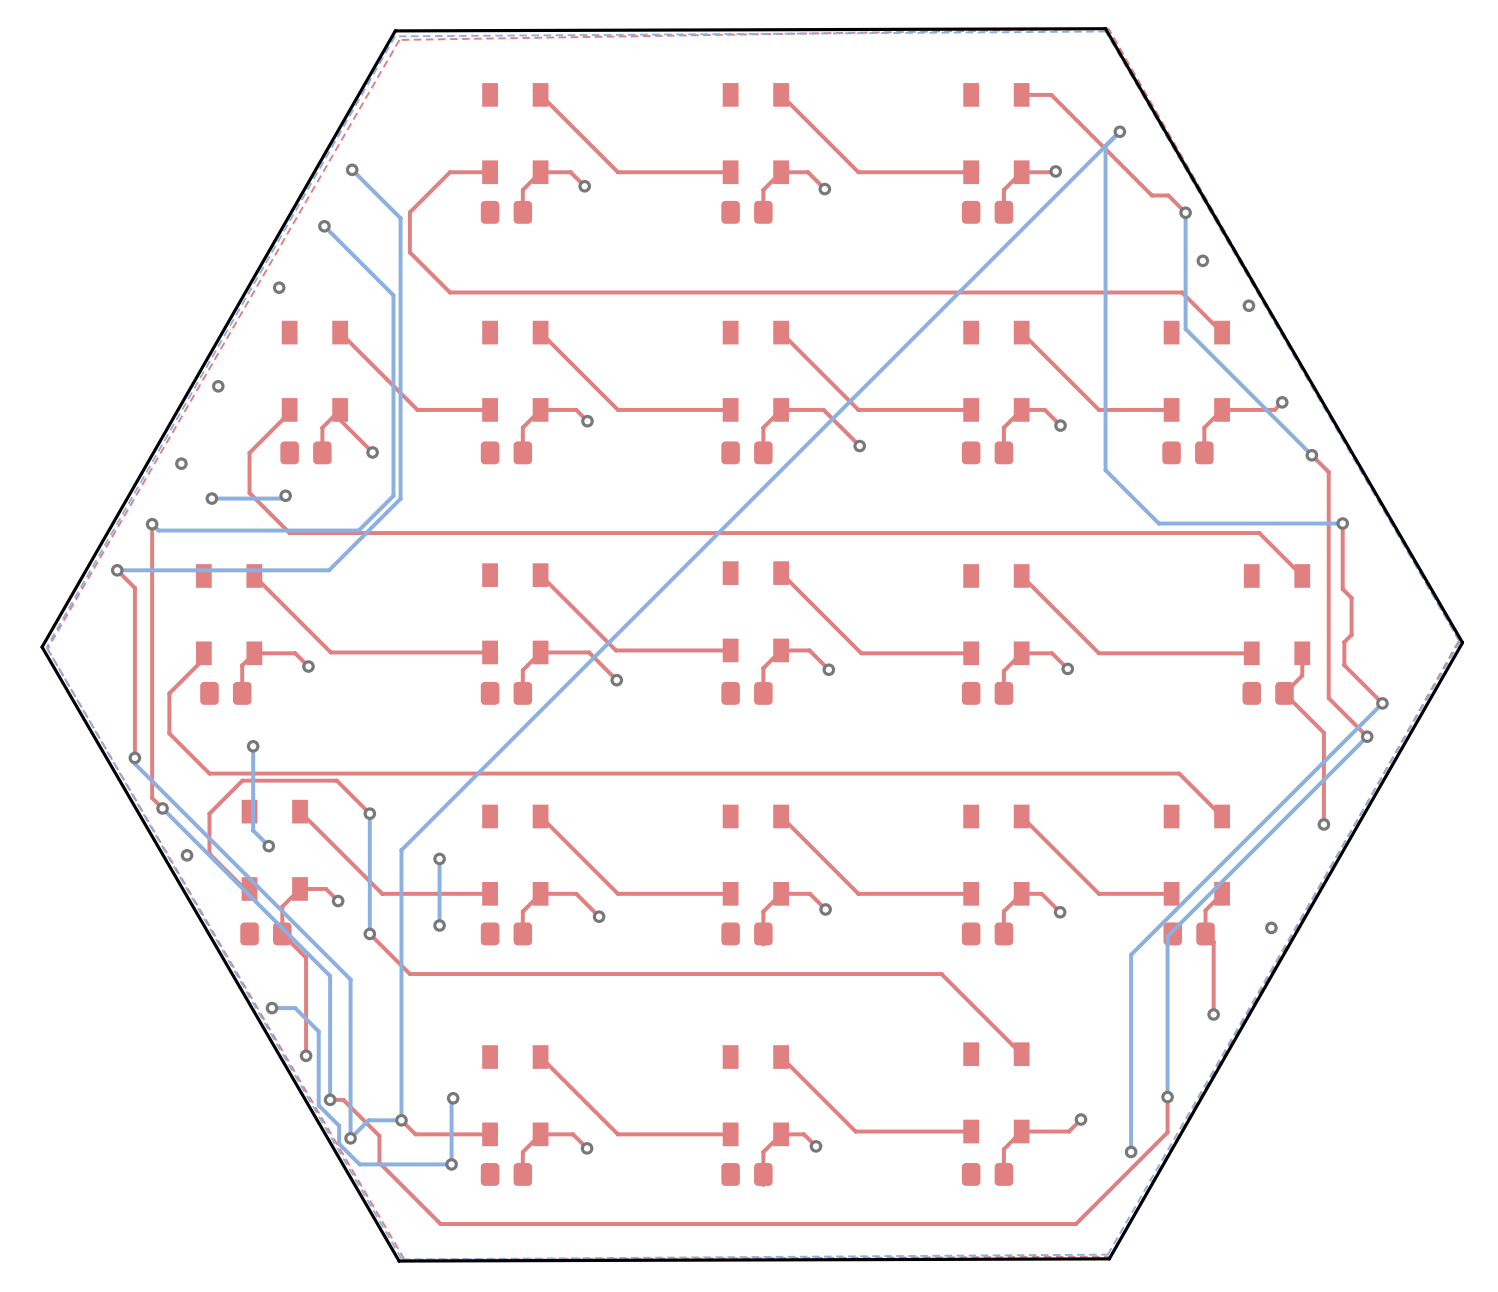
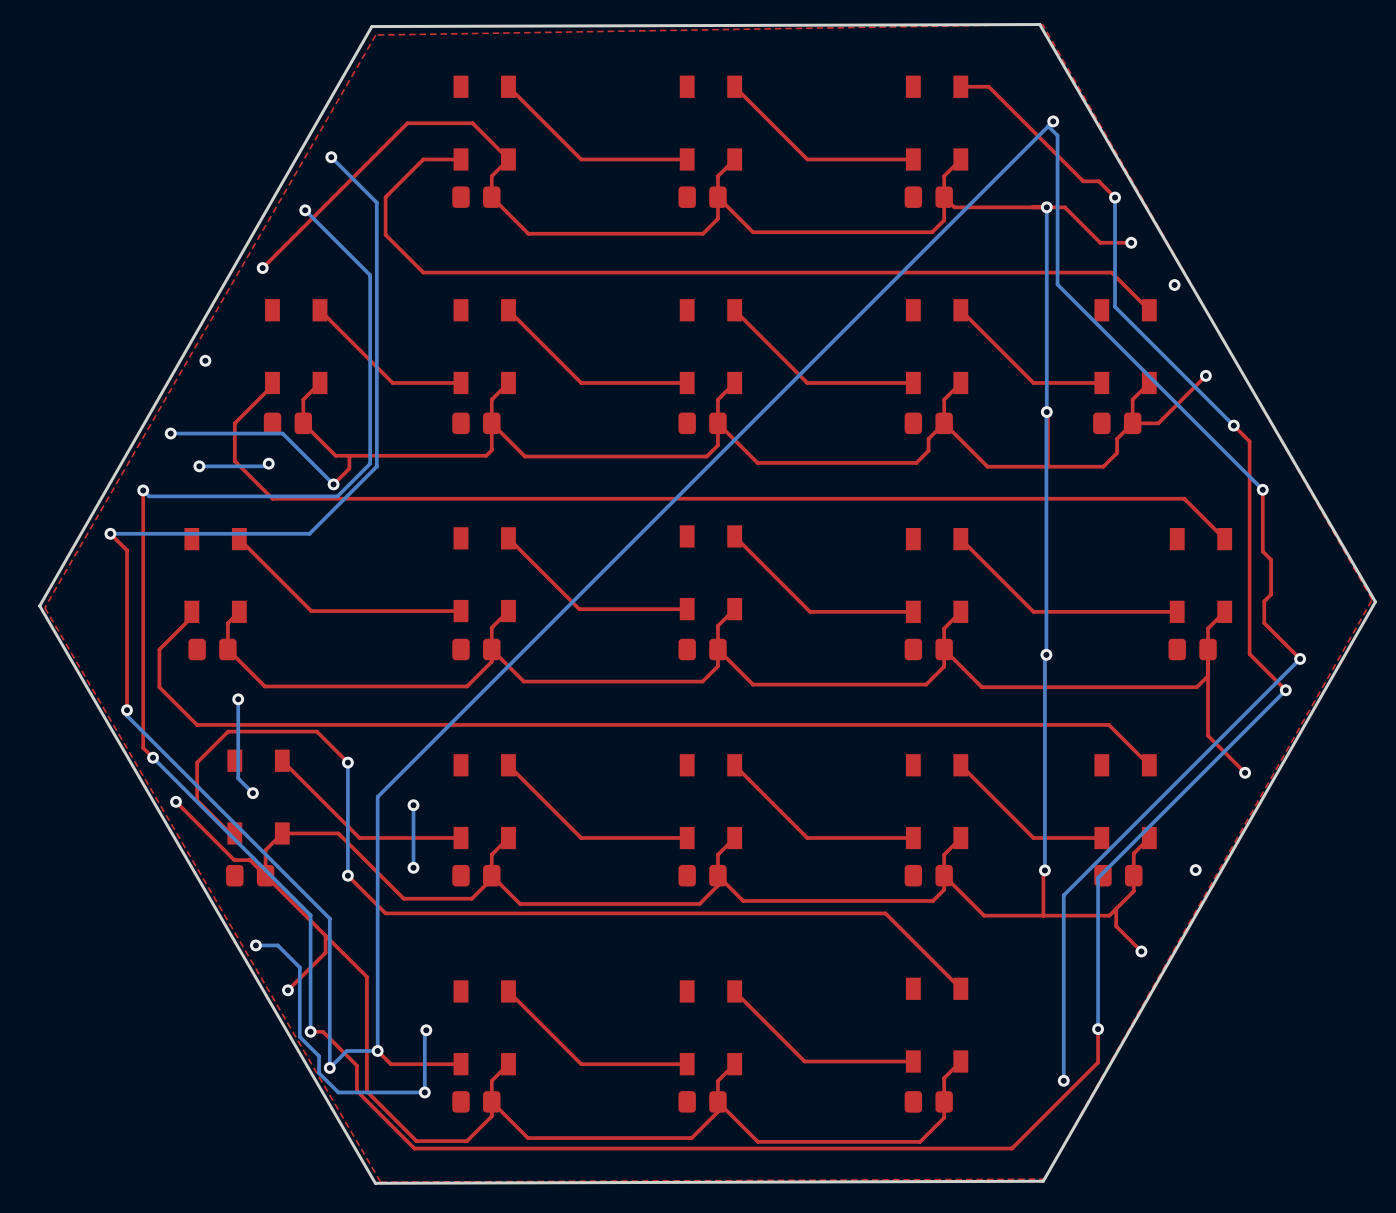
bottom zone outline: (1105, 31) (1459, 641) (1107, 1254) (401, 1259) (46, 647) (395, 36) (1105, 31) -> none
bottom track: (1105, 146) (1105, 470) (1158, 523) (1342, 523) -> (1048, 126) (1057, 135) (1057, 284) (1262, 489)
top track: (1055, 171) (1021, 172) -> none
via position: (1055, 171) -> (1046, 207)
top track: (540, 172) (570, 172) (584, 186) -> (508, 159) (472, 123) (407, 123) (262, 268)
top track: (781, 172) (807, 172) (824, 189) -> none
via: (584, 186) -> none
via: (824, 189) -> none
top track: none -> (491, 197) (528, 233) (703, 233) (717, 218) (717, 197) (753, 232) (932, 232) (944, 220) (944, 197) (954, 207) (1064, 207) (1100, 242) (1131, 242)
bottom track: none -> (1046, 207) (1044, 870)
top track: (340, 409) (340, 419) (372, 452) -> none
top track: (540, 409) (576, 409) (587, 421) -> none
top track: (781, 409) (823, 409) (859, 446) -> none
top track: (1021, 409) (1044, 409) (1060, 425) -> none
top track: (1274, 409) (1222, 409) -> (1198, 382) (1158, 423) (1132, 423) (1117, 438) (1117, 453) (1103, 466) (987, 466) (944, 423) (928, 438) (928, 450) (916, 462) (757, 462) (717, 423) (717, 445) (706, 456) (524, 456) (491, 423) (491, 450) (486, 455) (335, 455) (303, 423)
via: (587, 421) -> none
via position: (1060, 425) -> (1046, 412)
top track: none -> (1046, 412) (1047, 466)
via: (859, 446) -> none
via position: (372, 452) -> (333, 484)
bottom track: none -> (170, 433) (282, 433) (333, 484)
top track: none -> (349, 455) (349, 468) (333, 484)
top track: (781, 650) (809, 650) (828, 669) -> none
top track: (540, 652) (589, 652) (616, 680) -> none
top track: (254, 653) (295, 653) (308, 666) -> none
top track: (1021, 653) (1052, 653) (1067, 668) -> none
top track: (1302, 653) (1302, 675) (1284, 693) (1323, 732) (1323, 824) -> (1224, 611) (1208, 628) (1208, 735) (1245, 772)
via: (308, 666) -> none
via position: (1067, 668) -> (1046, 654)
via: (828, 669) -> none
via: (616, 680) -> none
top track: none -> (227, 649) (264, 686) (467, 686) (491, 661) (491, 649) (523, 681) (702, 681) (717, 666) (717, 649) (753, 684) (926, 684) (944, 666) (944, 656)
top track: none -> (944, 649) (981, 687) (1196, 687) (1208, 676)
top track: none -> (176, 801) (234, 860) (250, 860) (265, 875)
top track: (326, 888) (338, 901) -> (306, 833) (338, 833) (403, 898) (471, 898) (491, 878)
top track: (540, 893) (576, 893) (599, 916) -> none
top track: (781, 893) (809, 893) (825, 909) -> none
top track: (1021, 893) (1041, 893) (1060, 912) -> none
via: (338, 901) -> none
via: (825, 909) -> none
via position: (1060, 912) -> (1044, 870)
via: (599, 916) -> none
top track: none -> (1044, 870) (1043, 915)
top track: none -> (491, 875) (520, 903) (699, 903) (717, 885)
top track: (1205, 933) (1213, 942) (1213, 1014) -> (1116, 908) (1116, 926) (1141, 951)
top track: none -> (1133, 875) (1133, 891) (1109, 915) (984, 915) (944, 875) (944, 889) (932, 900) (743, 900) (717, 875)
top track: (306, 957) (306, 1055) -> (325, 935) (325, 952) (287, 990)
top track: none -> (287, 898) (366, 976) (366, 1091) (416, 1141) (467, 1141) (491, 1116) (491, 1101) (527, 1138) (691, 1138) (717, 1111)
top track: (1080, 1119) (1068, 1131) (1021, 1131) -> none
via: (1080, 1119) -> none
top track: (540, 1134) (573, 1134) (587, 1148) -> none
top track: (781, 1134) (803, 1134) (815, 1146) -> none
via: (815, 1146) -> none
via: (587, 1148) -> none
top track: none -> (944, 1101) (944, 1117) (920, 1141) (757, 1141) (717, 1101)

